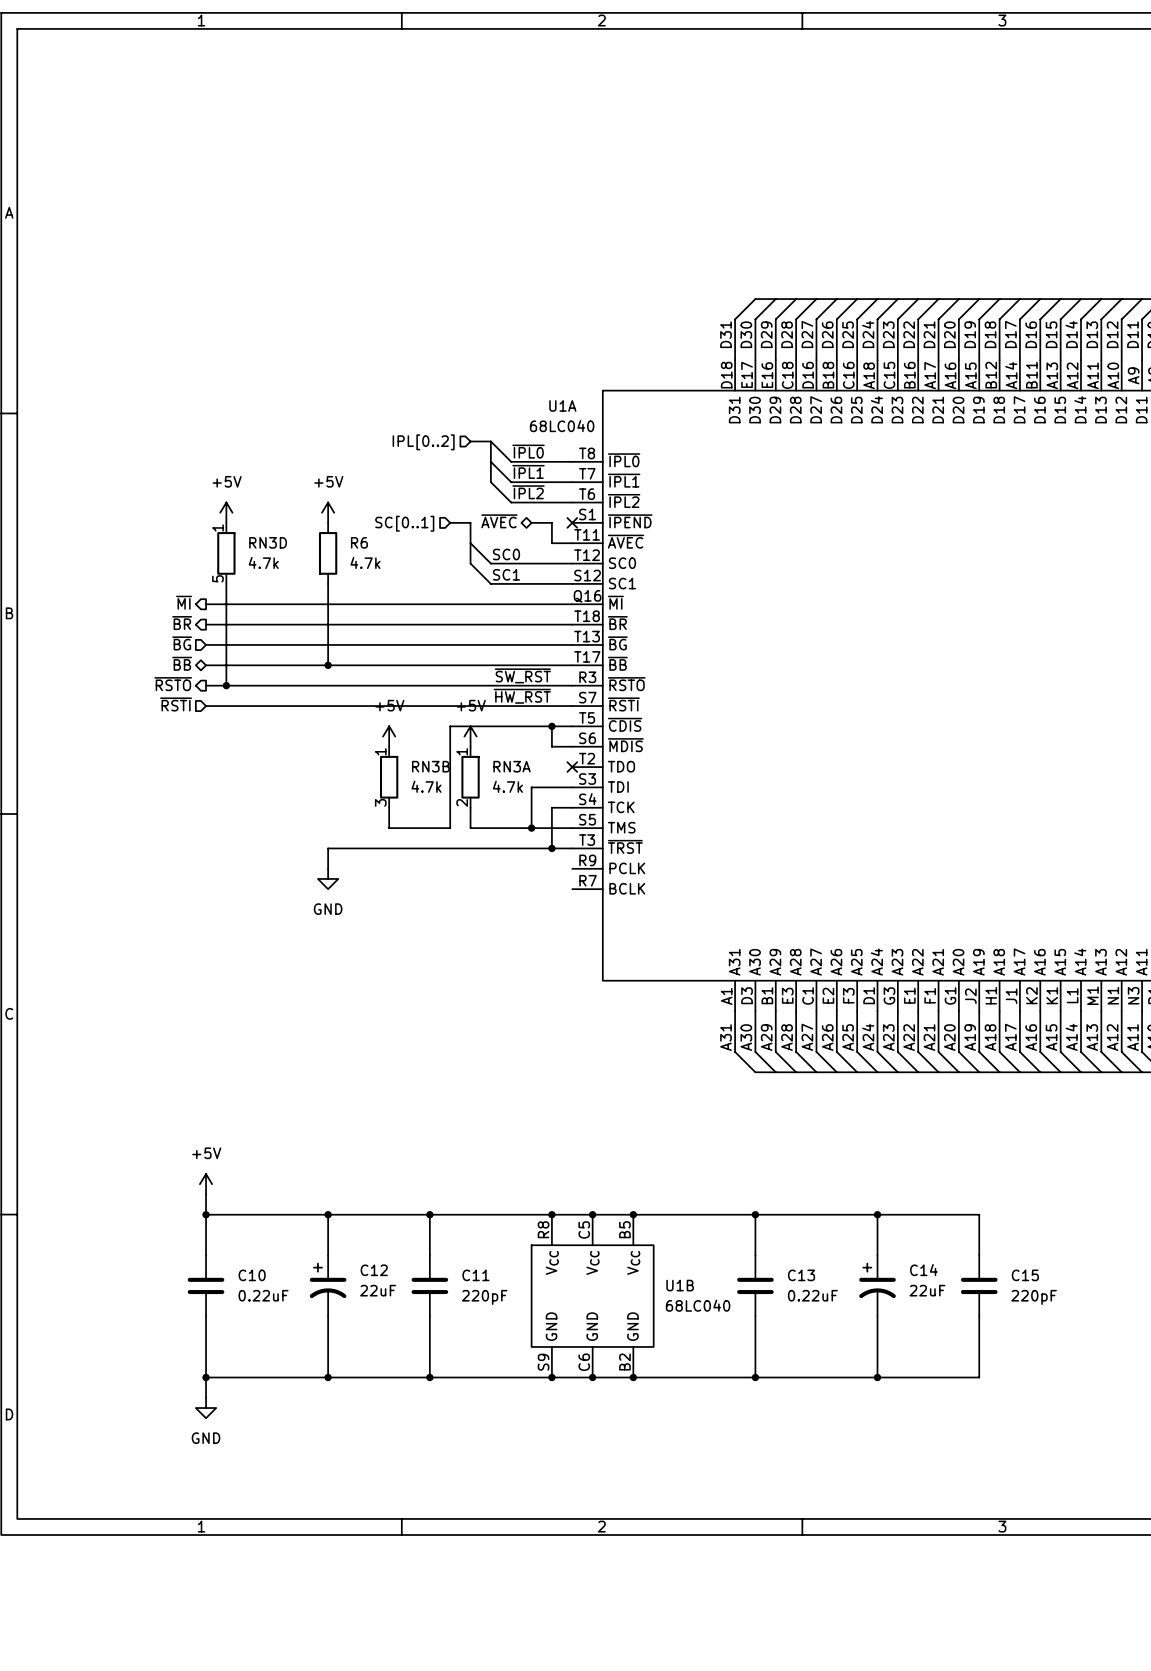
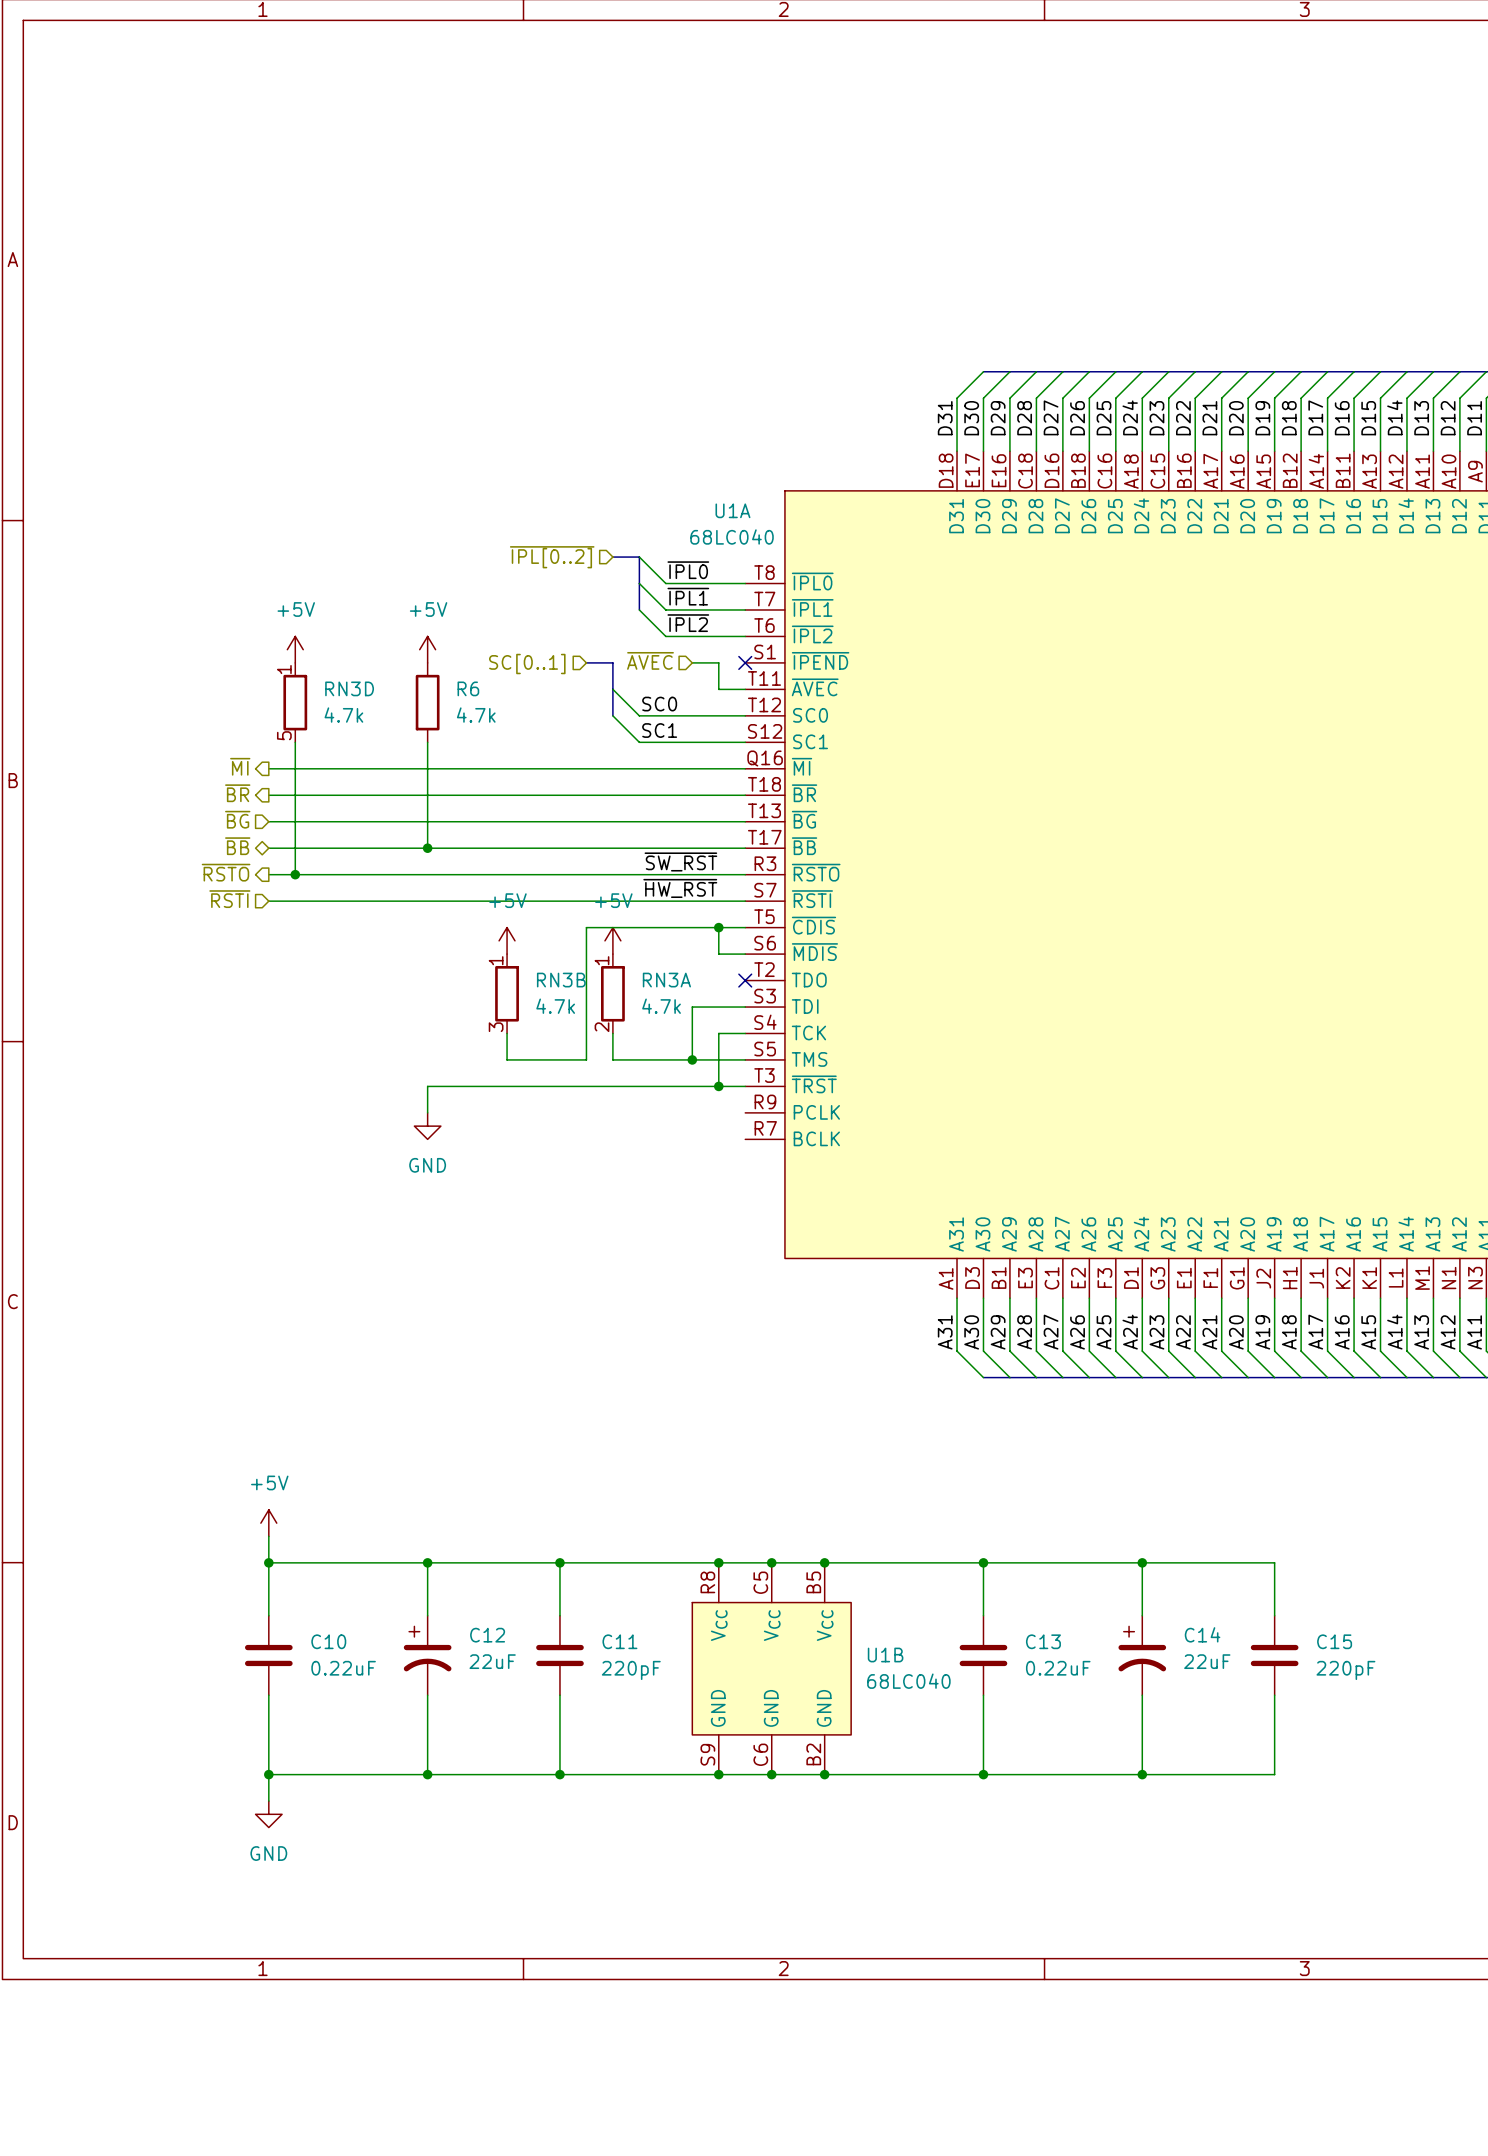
hierarchical label: IPL[0..2] (423, 442) -> ~{IPL[0..2]} (552, 557)
hierarchical label shape: bidirectional (499, 521) -> input (650, 660)

